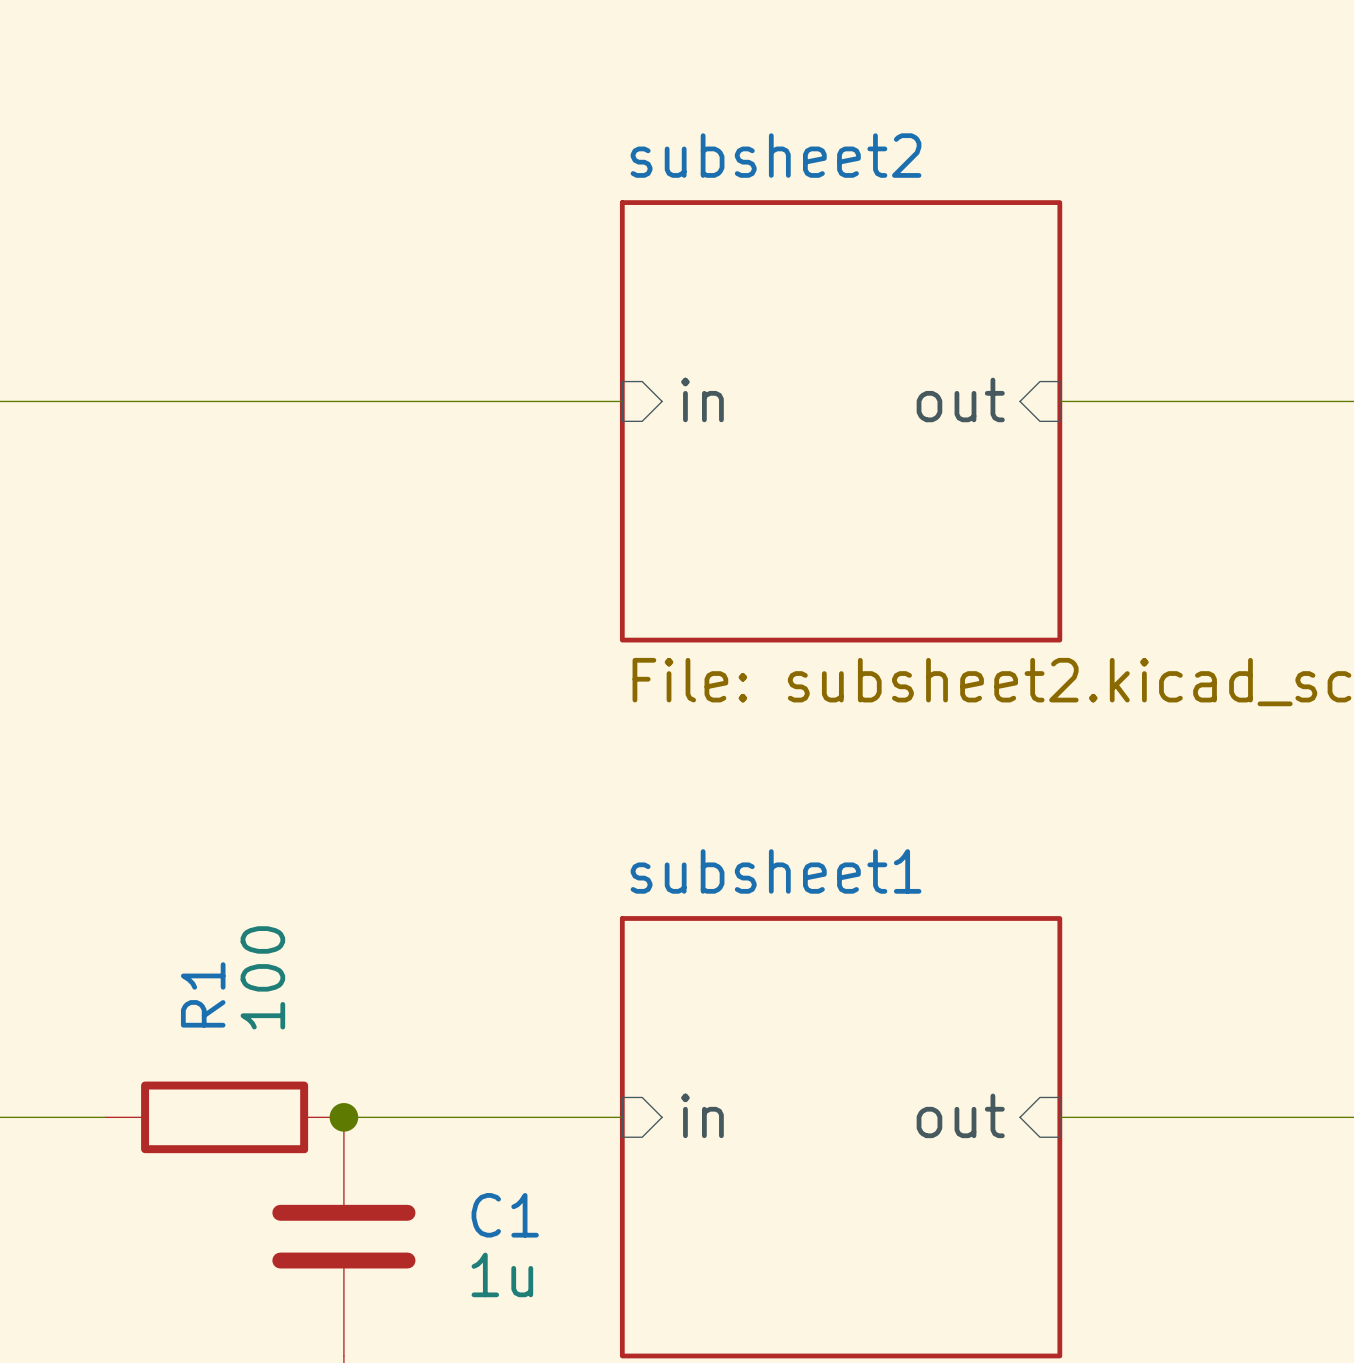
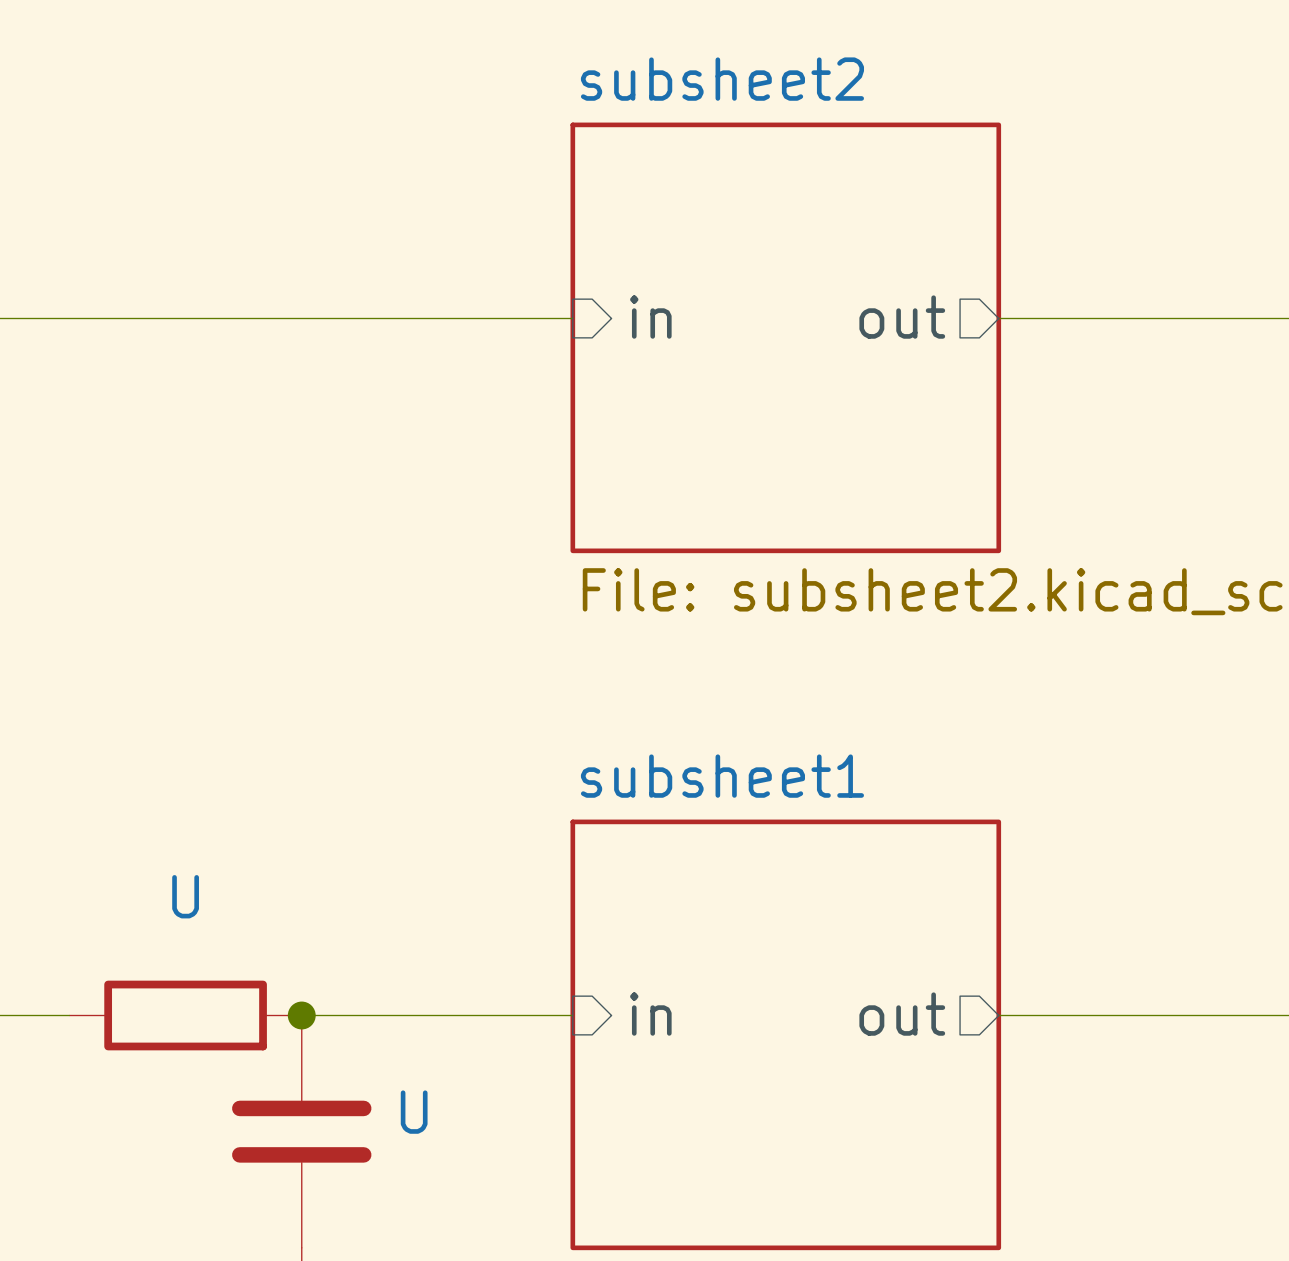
sheet pin shape: input (960, 399) -> output (902, 317)
R1 value: 100 (262, 977) -> none
R1 name: R1 (203, 994) -> U (185, 896)
sheet pin shape: input (960, 1115) -> output (902, 1014)
C1 name: C1 (505, 1215) -> U (414, 1112)
C1 value: 1u (502, 1274) -> none

